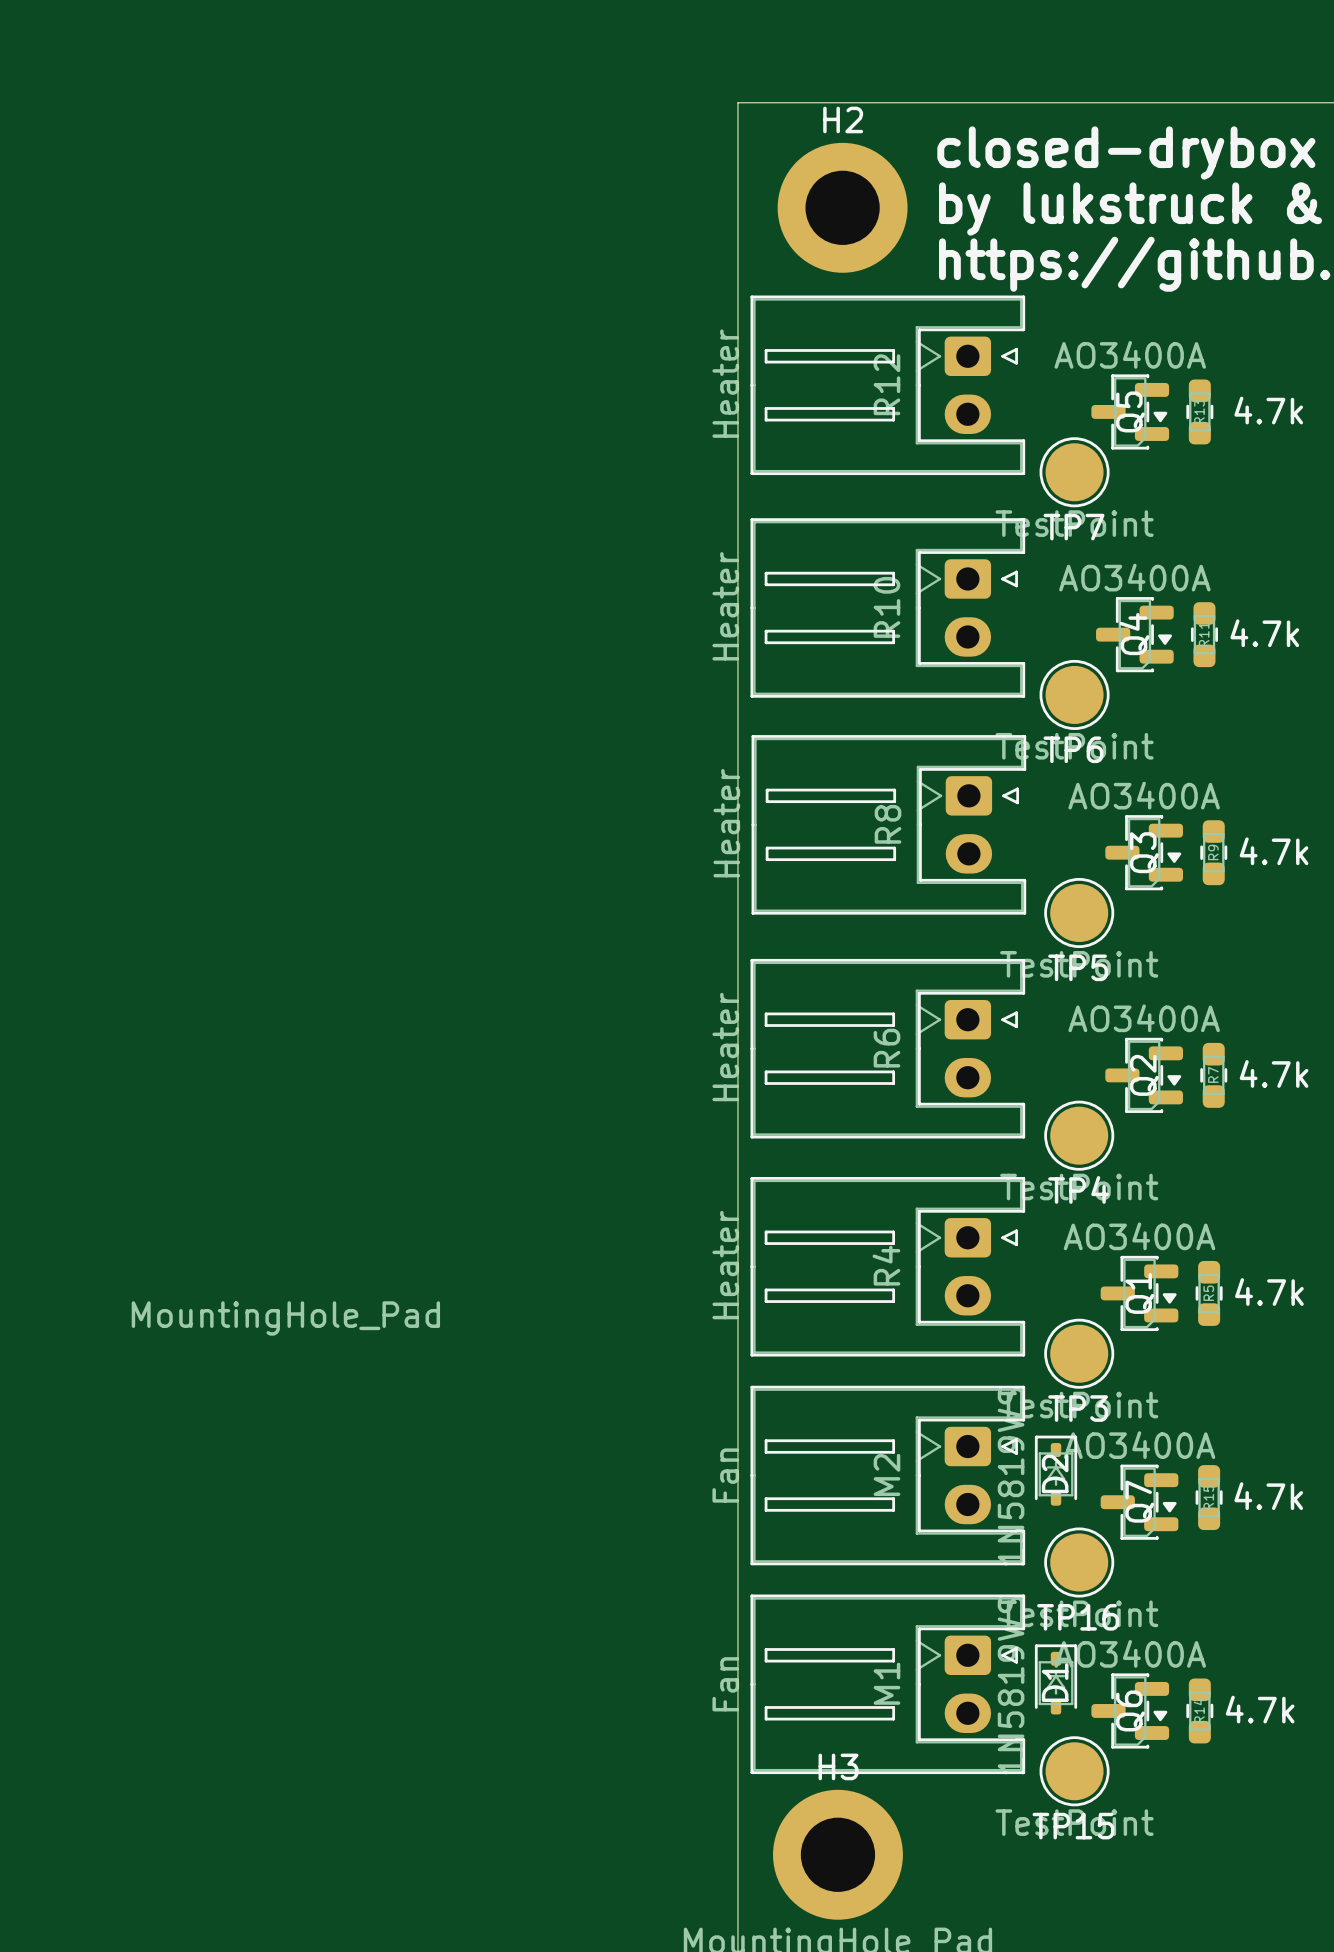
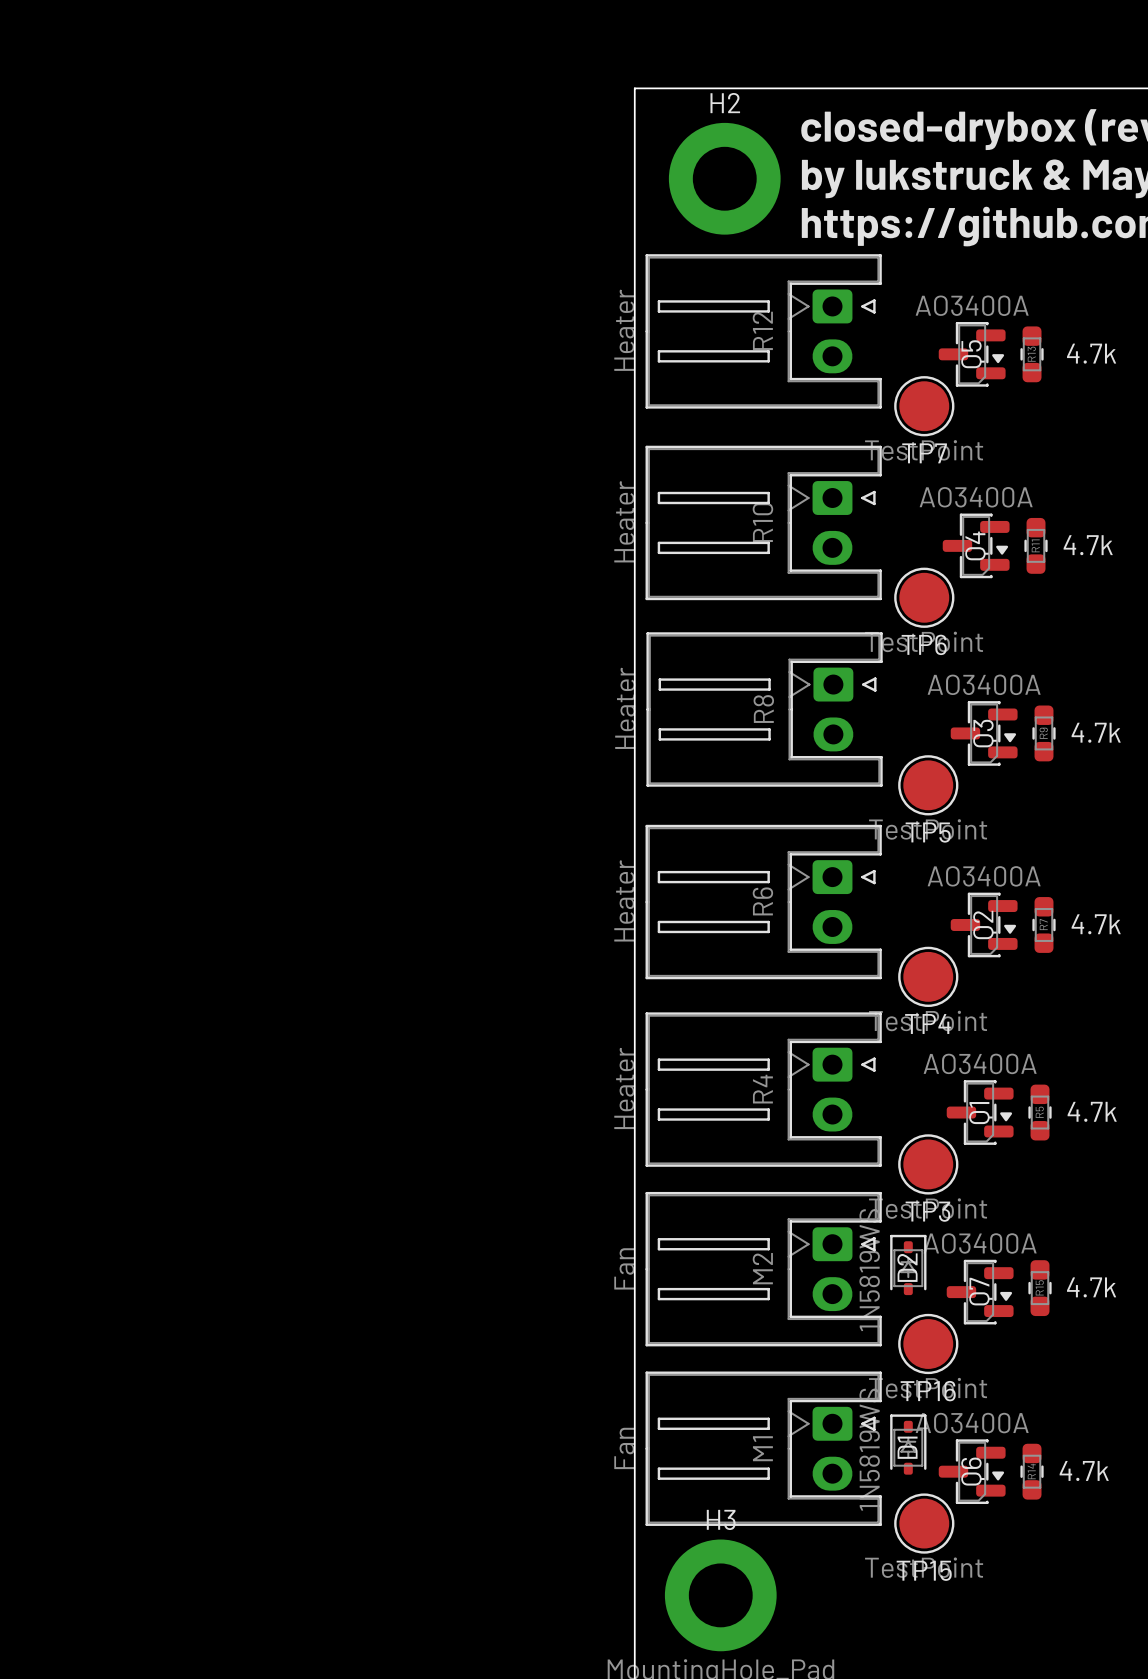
H2 value: MountingHole_Pad (285, 1318) -> none

